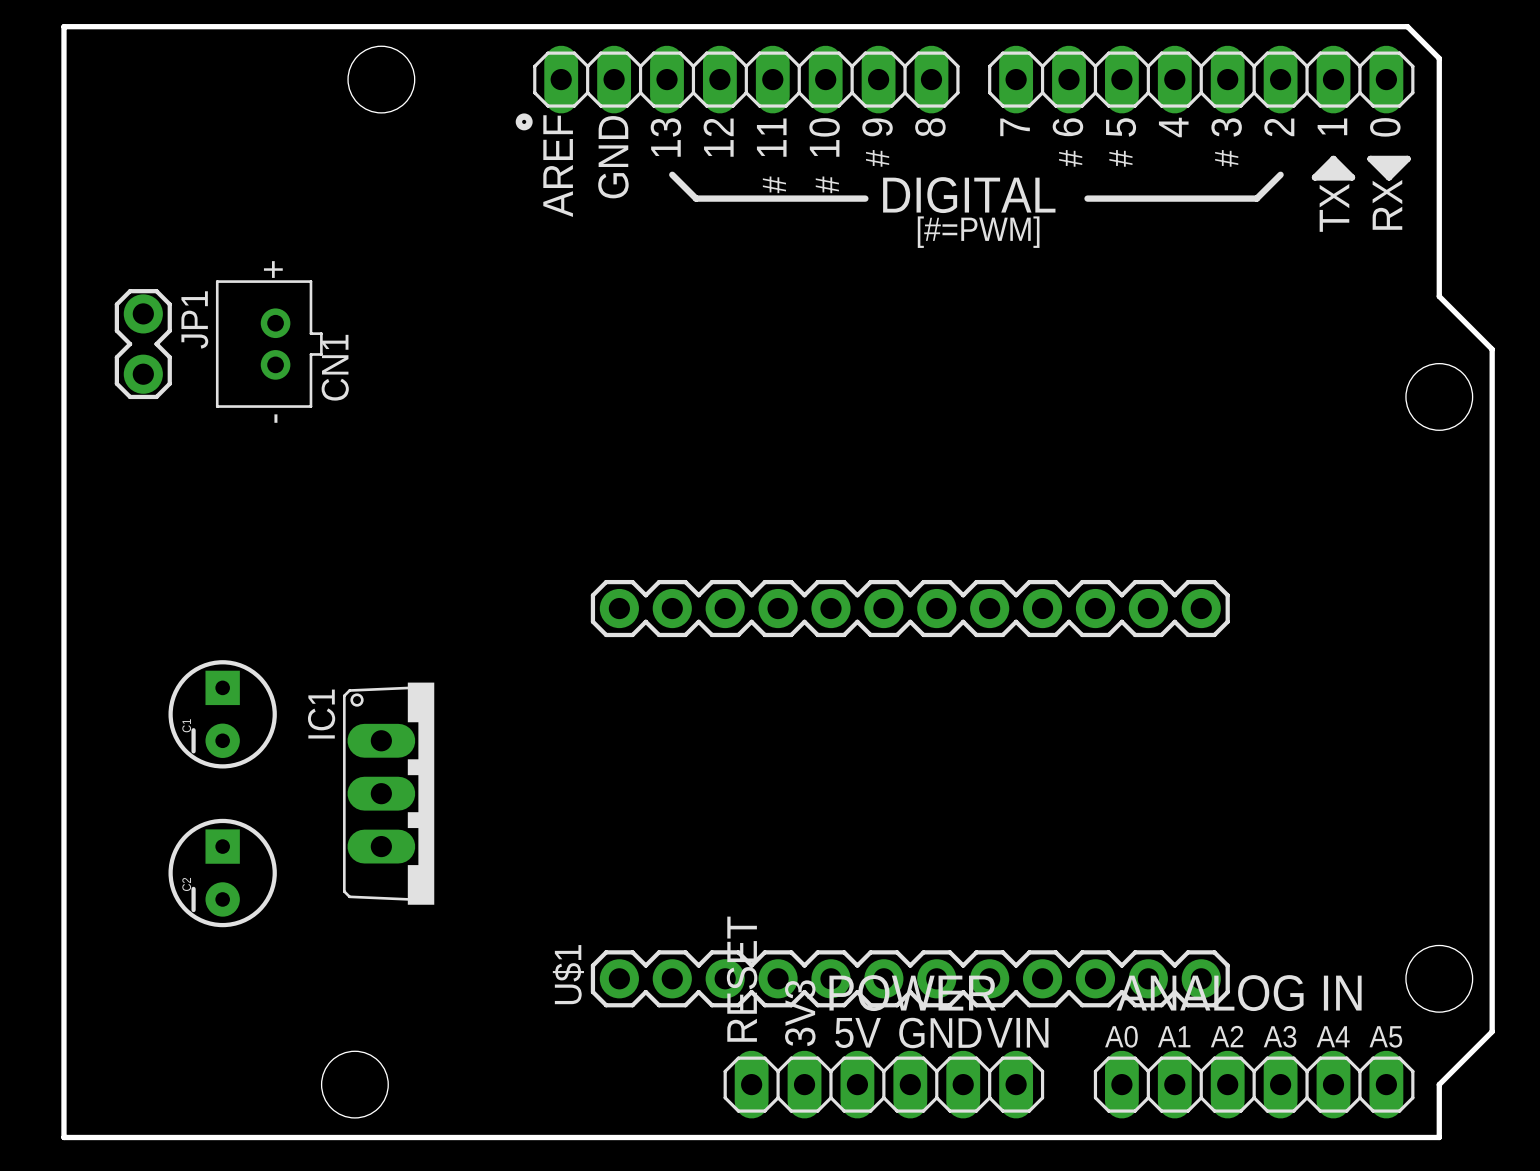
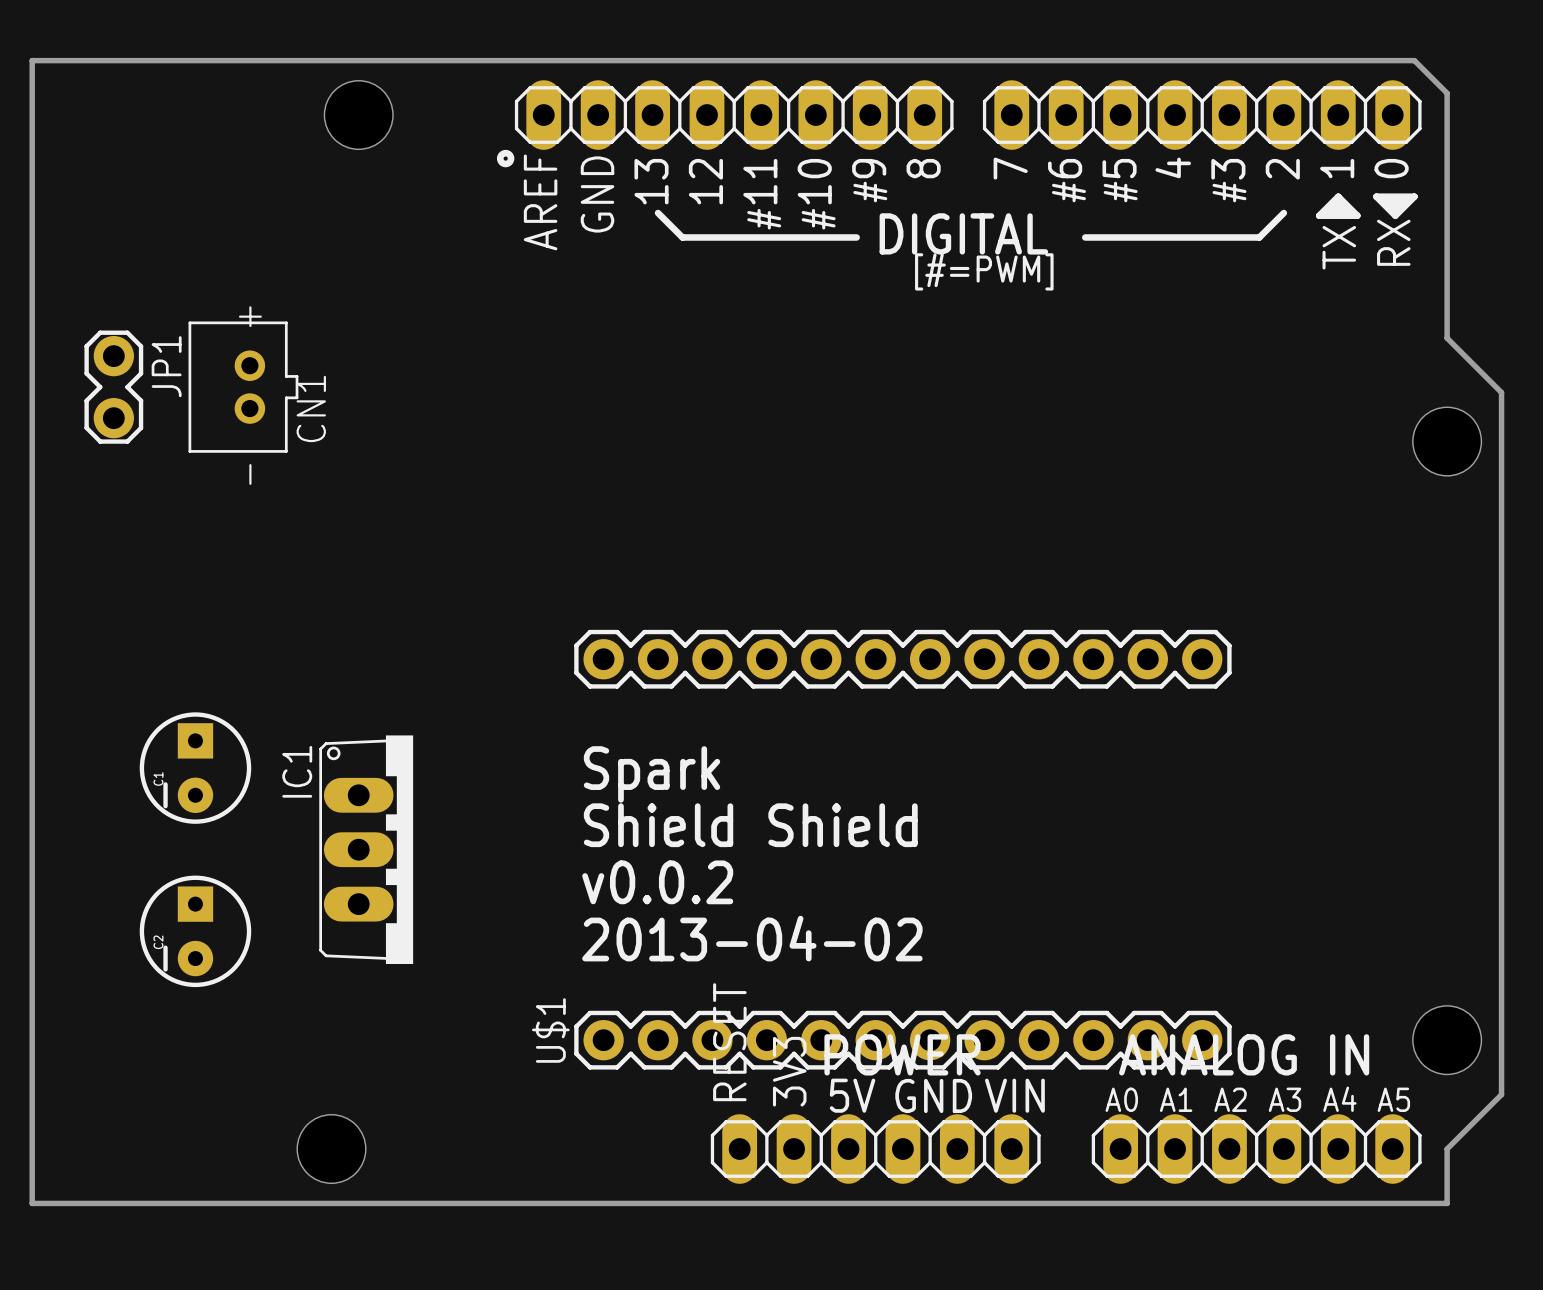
text: none -> Spark (652, 774)
text: none -> Shield Shield (750, 825)
text: none -> v0.0.2 (657, 882)
text: none -> 2013-04-02 (752, 938)

